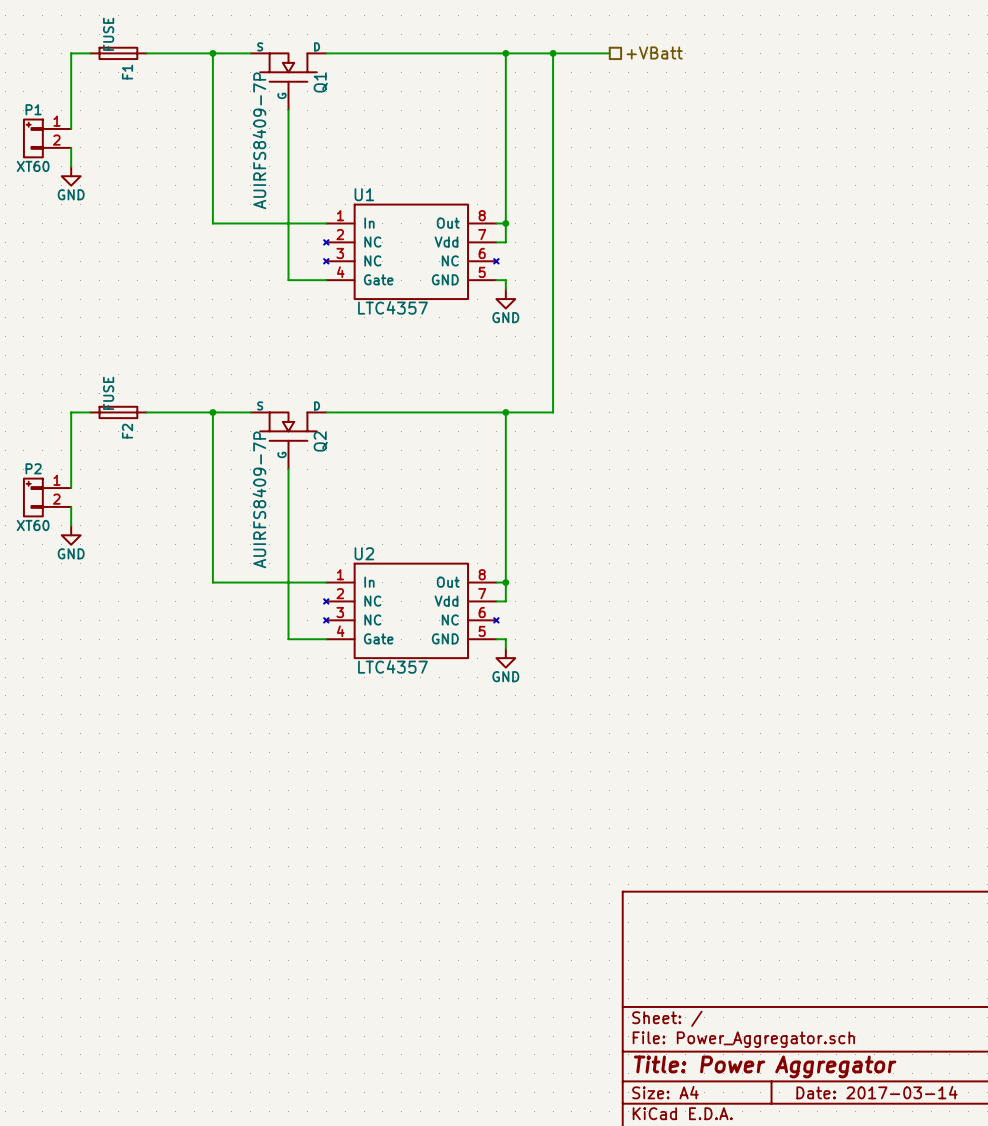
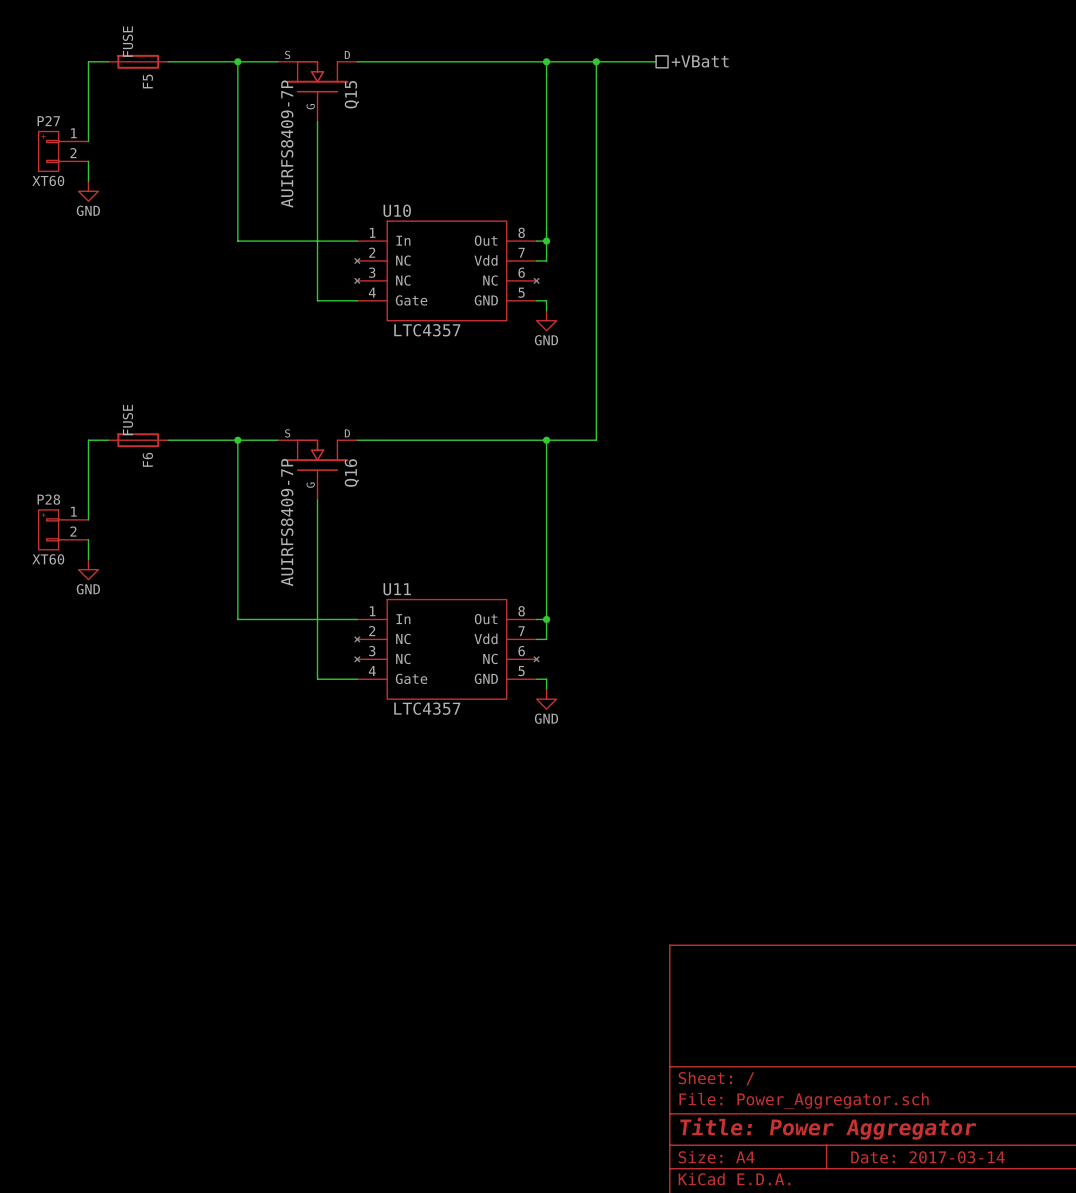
F1 name: F1 (127, 72) -> F5 (147, 81)
Q1 name: Q1 (320, 82) -> Q15 (351, 94)
P1 name: P1 (33, 109) -> P27 (48, 121)
U1 name: U1 (364, 194) -> U10 (397, 210)
F2 name: F2 (127, 431) -> F6 (147, 459)
Q2 name: Q2 (320, 441) -> Q16 (351, 473)
P2 name: P2 (33, 468) -> P28 (48, 499)
U2 name: U2 (364, 553) -> U11 (397, 589)

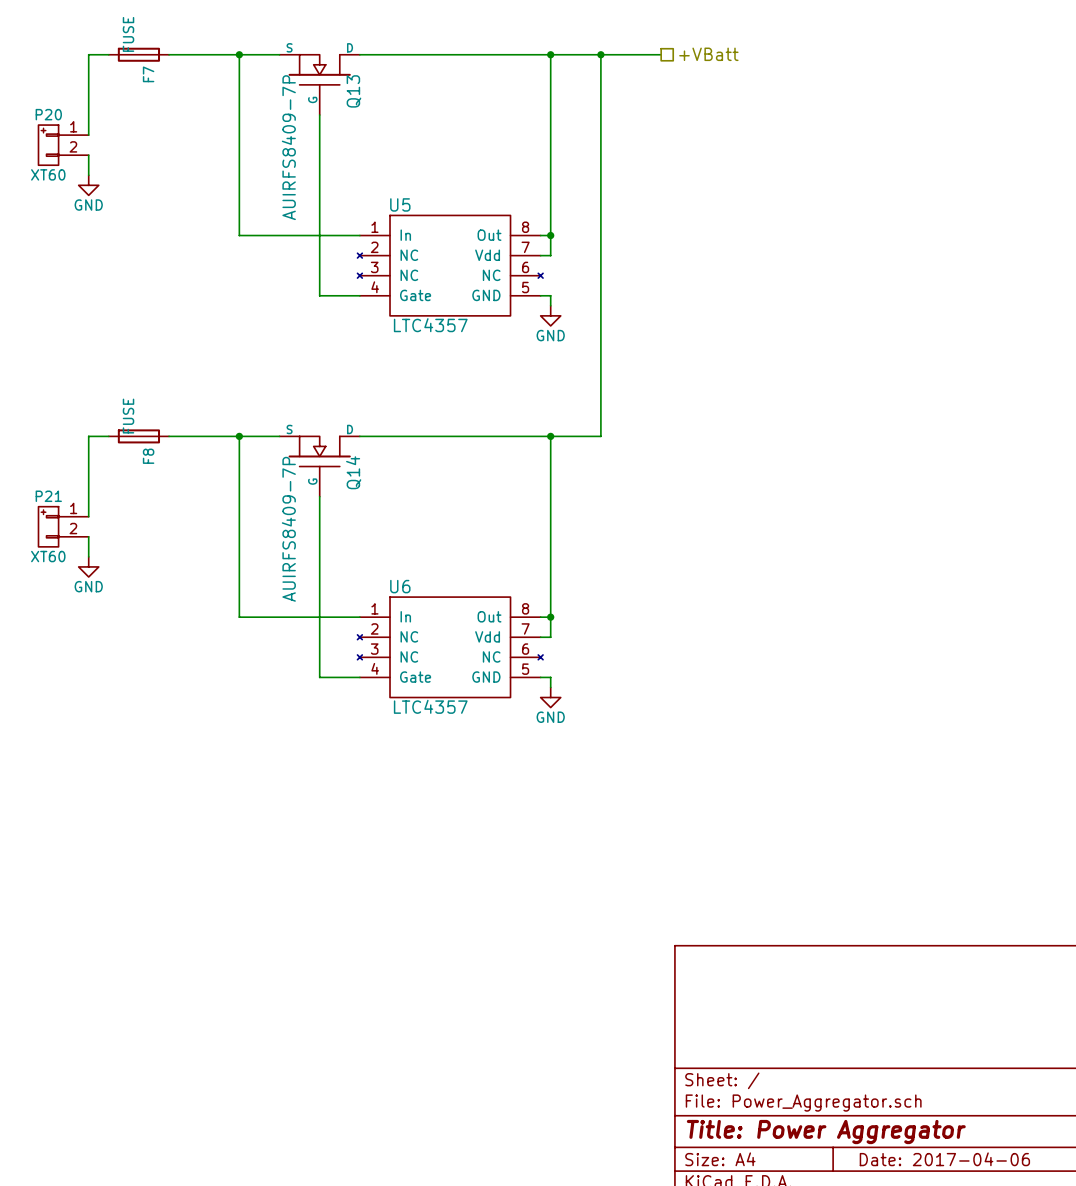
F5 name: F5 (147, 81) -> F7 (148, 74)
Q15 name: Q15 (351, 94) -> Q13 (353, 91)
P27 name: P27 (48, 121) -> P20 (48, 114)
U10 name: U10 (397, 210) -> U5 (400, 204)
F6 name: F6 (147, 459) -> F8 (148, 456)
Q16 name: Q16 (351, 473) -> Q14 (353, 472)
P28 name: P28 (48, 499) -> P21 (48, 496)
U11 name: U11 (397, 589) -> U6 (400, 586)
title block: Date: 2017-03-14 (927, 1157) -> Date: 2017-04-06 (944, 1159)

